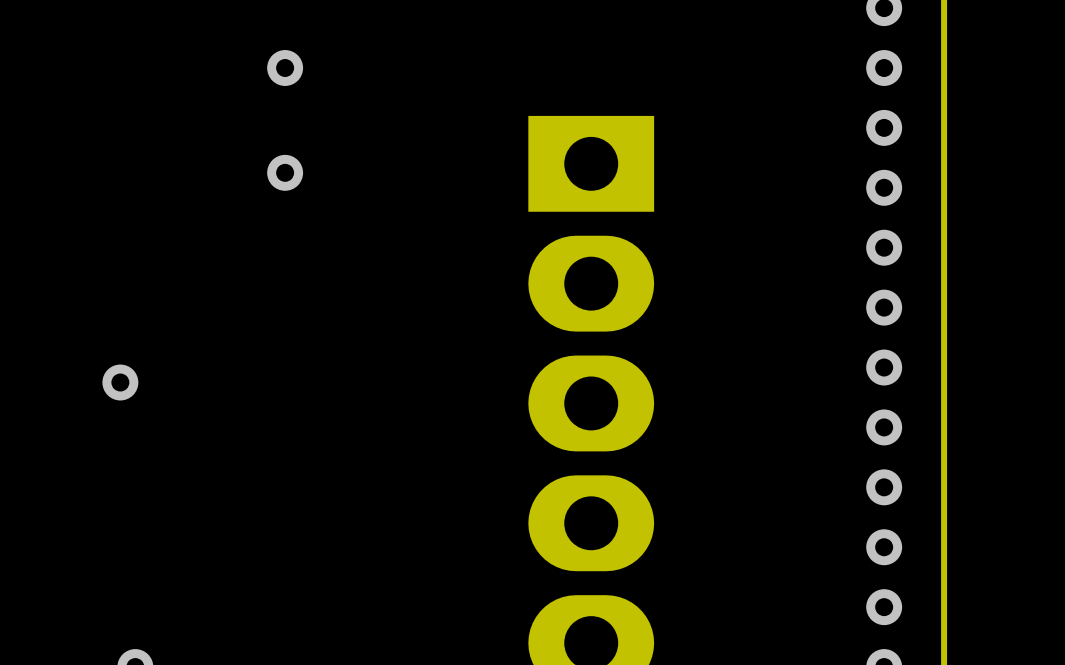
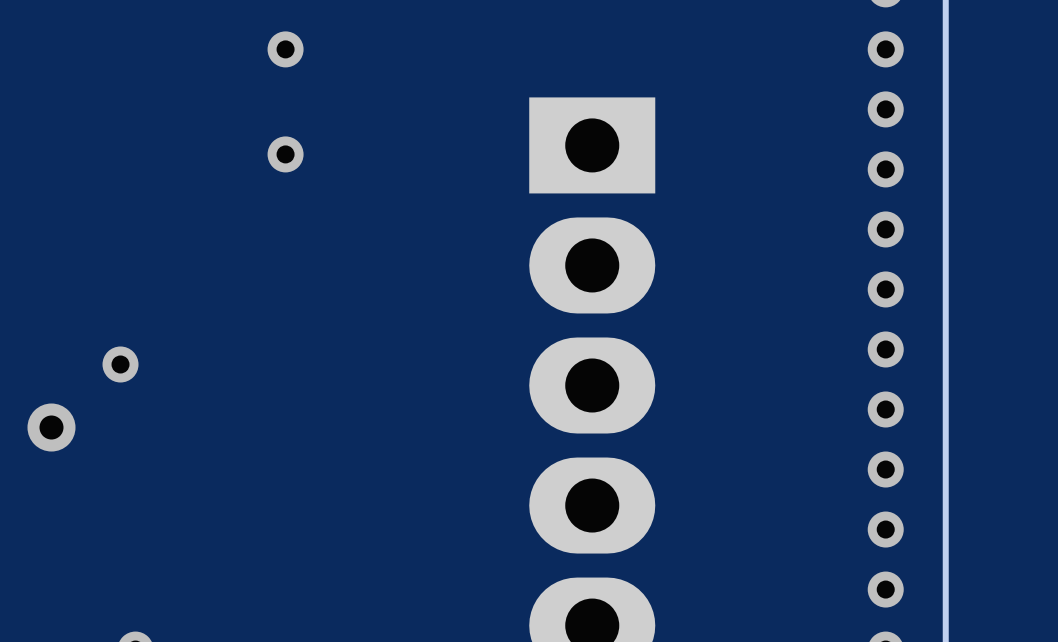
via: none -> (51, 427)

